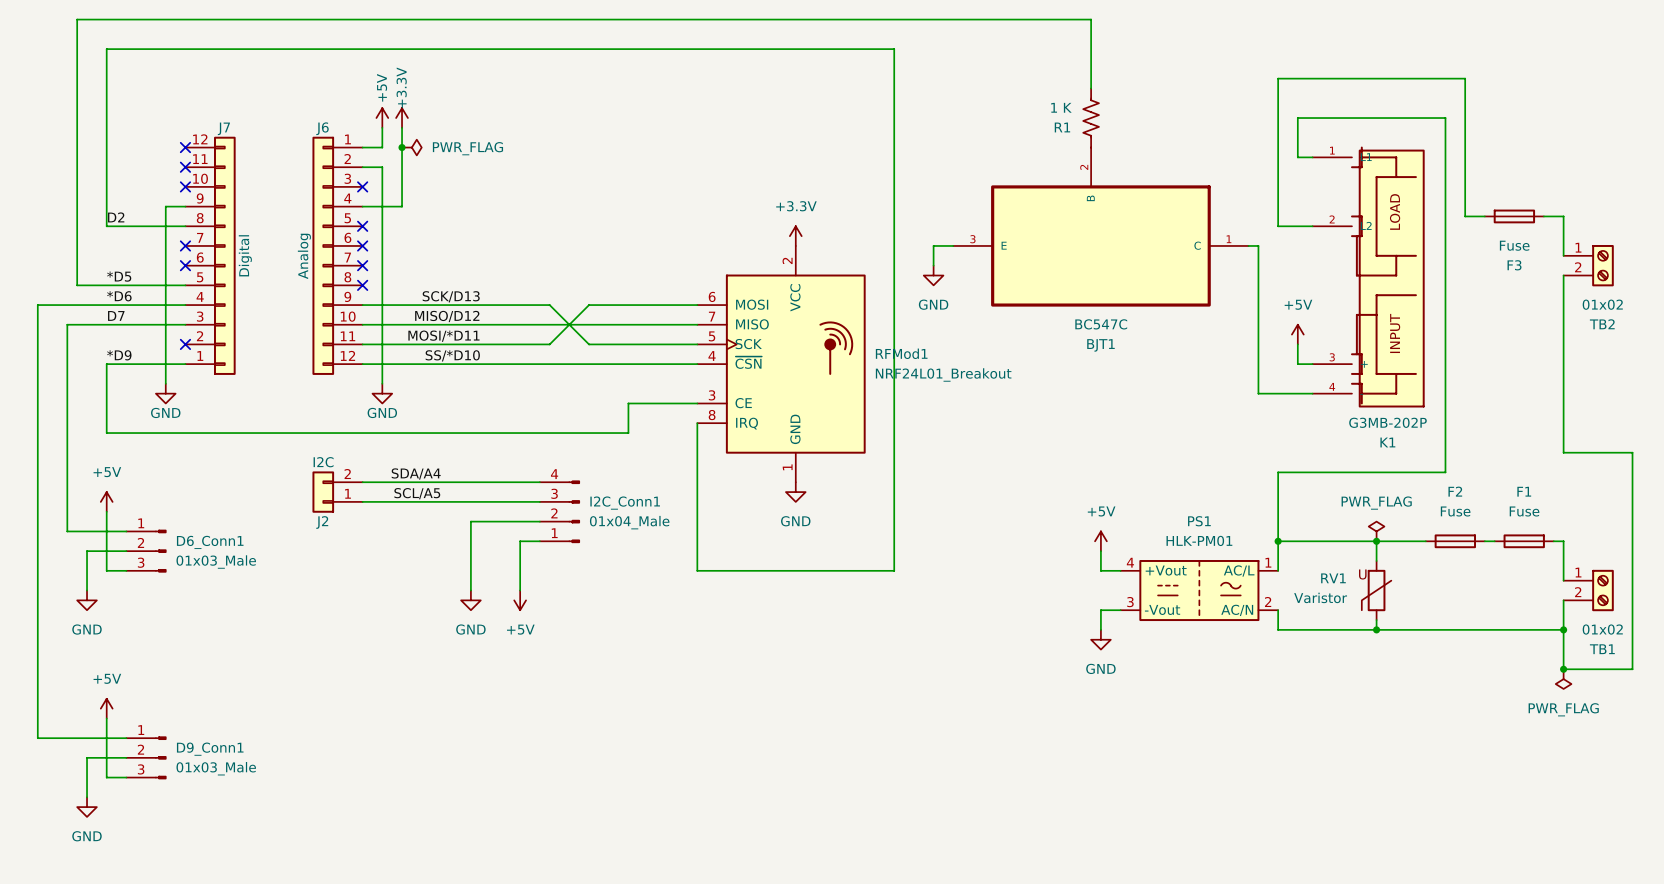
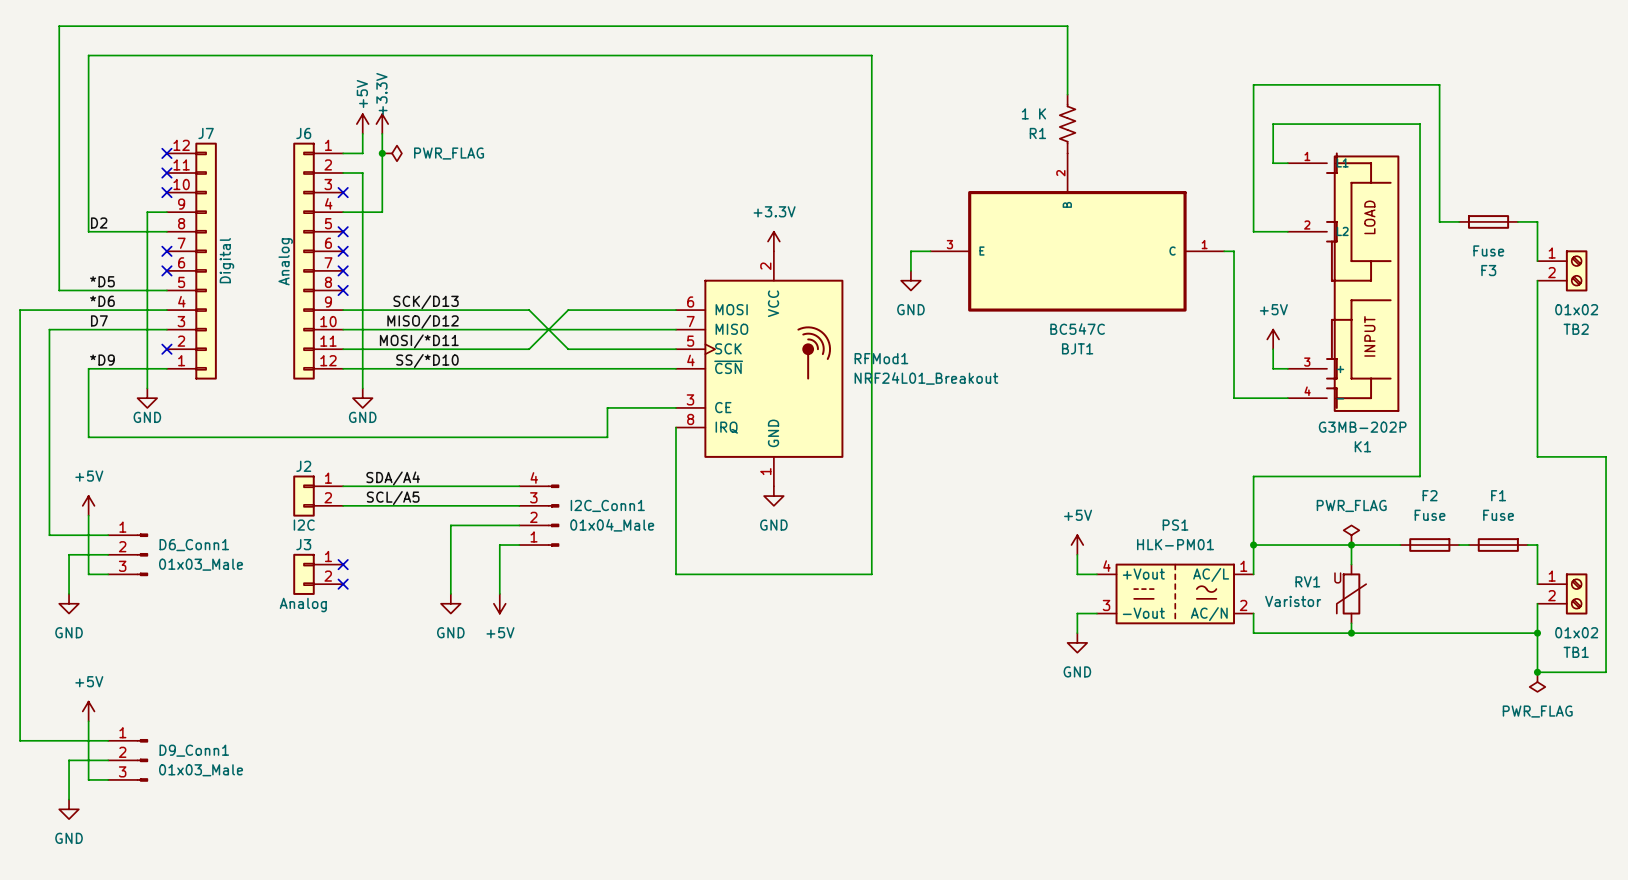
J2 flip: as is (323, 492) -> up-down (303, 496)
no-connect mark: none -> (343, 564)
J3: none -> Analog (318, 574)
no-connect mark: none -> (343, 584)

